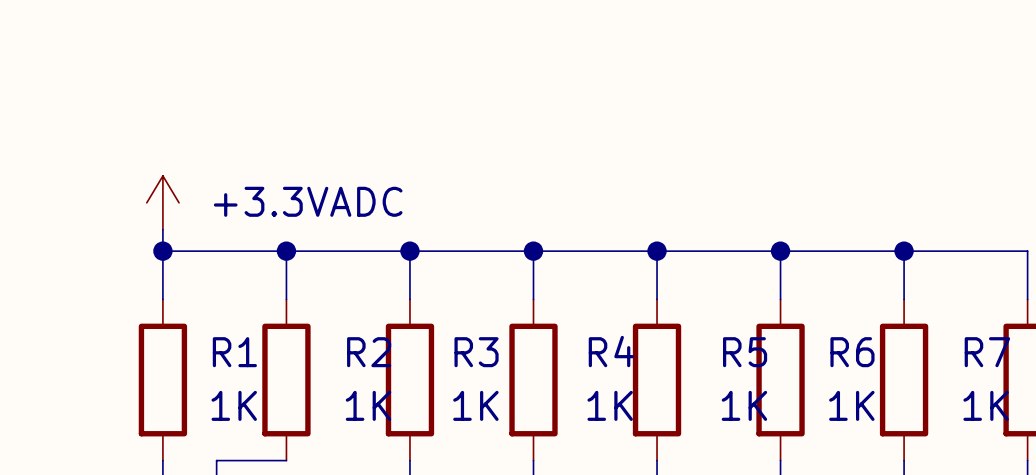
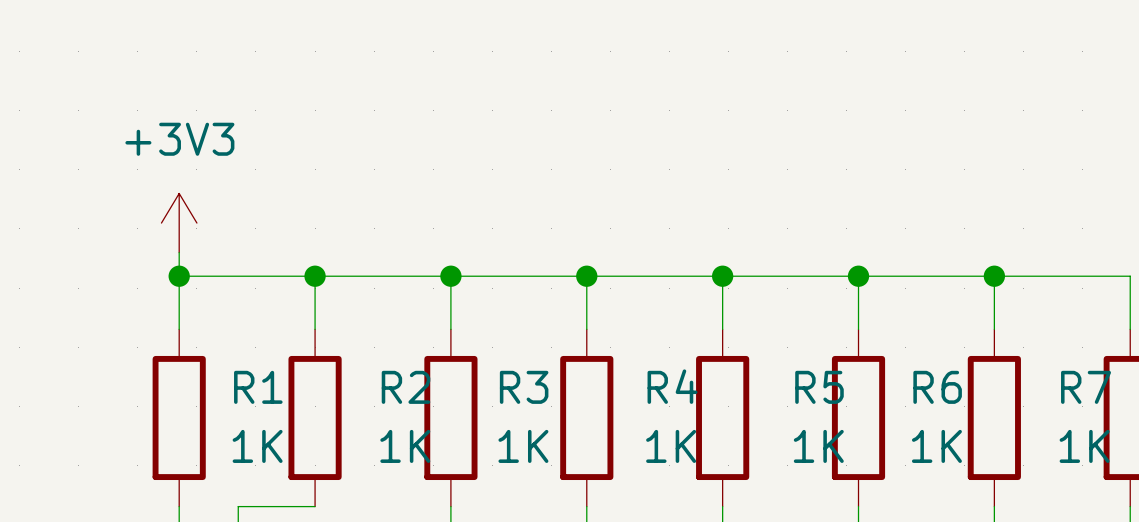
power symbol: +3.3VADC (162, 202) -> +3V3 (179, 223)

